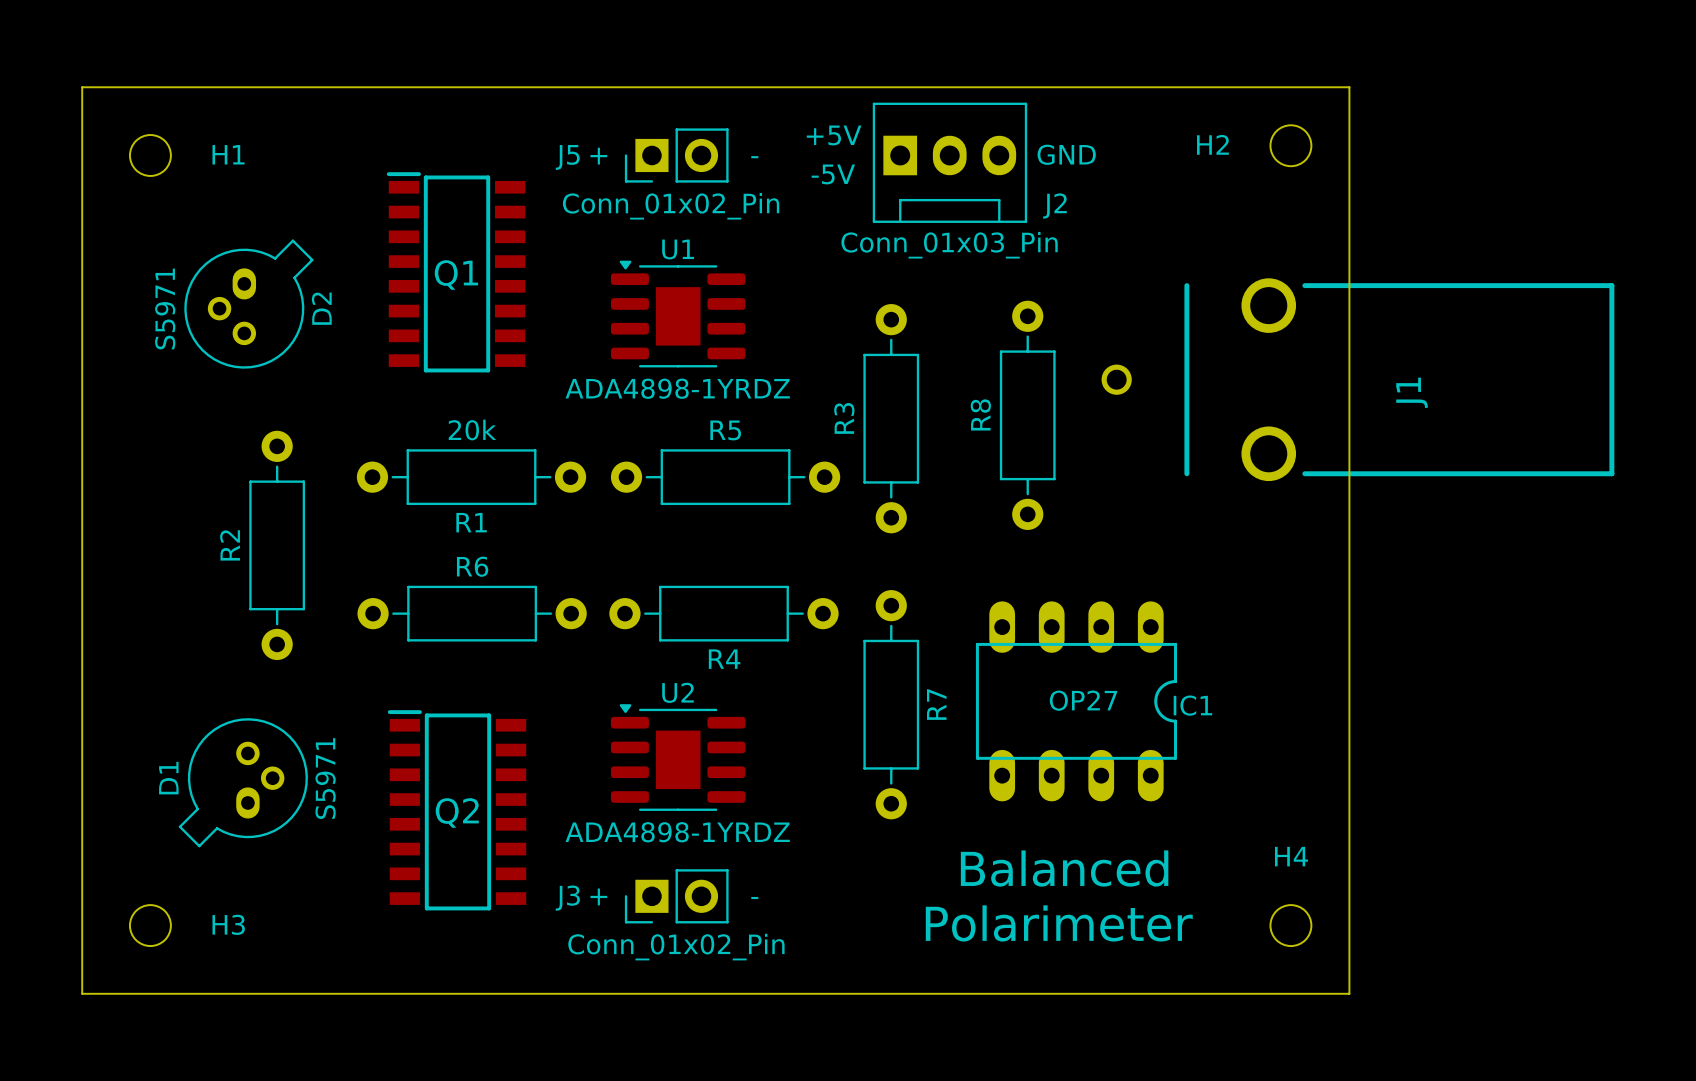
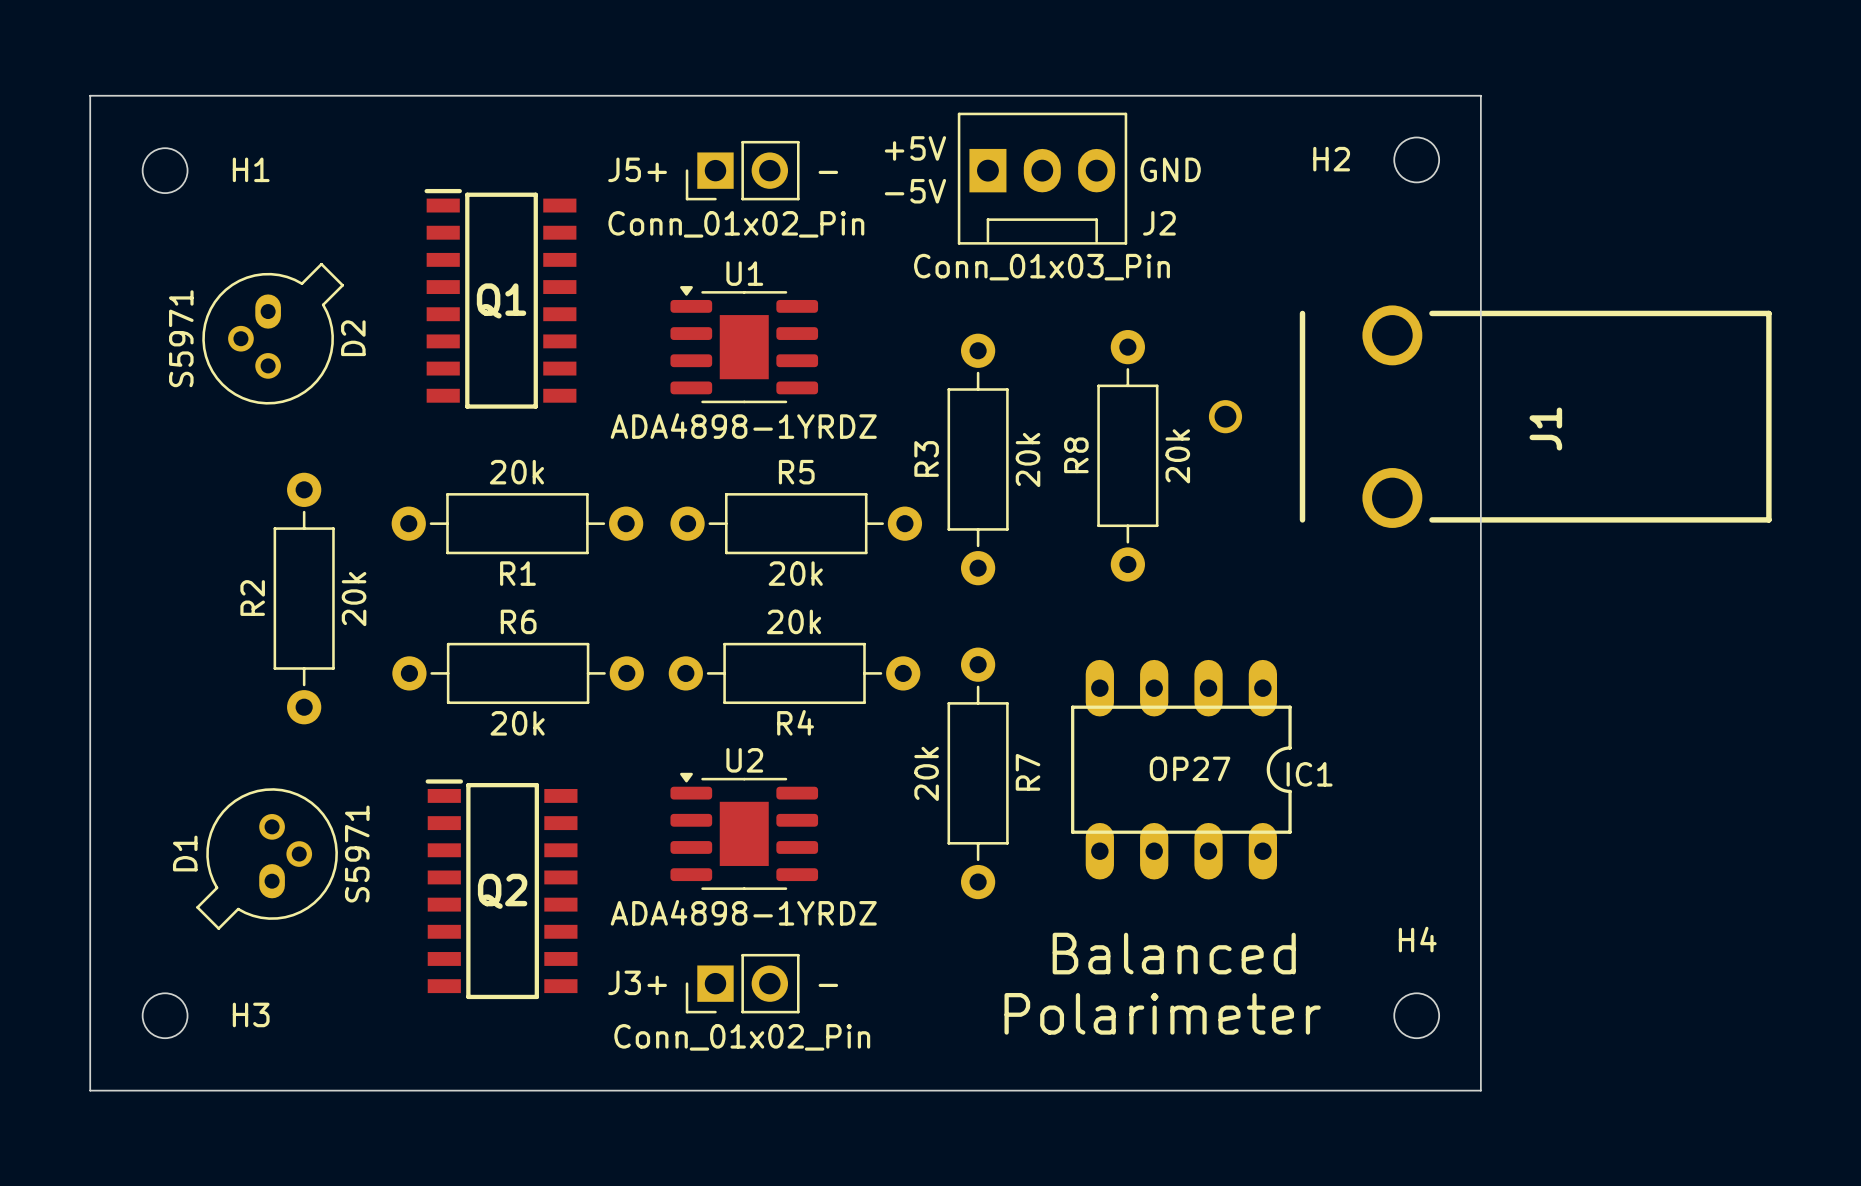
R8 value: none -> 20k (1177, 456)
R3 value: none -> 20k (1028, 459)
R5 value: none -> 20k (795, 573)
R2 value: none -> 20k (354, 599)
R4 value: none -> 20k (794, 621)
R6 value: none -> 20k (517, 723)
R7 value: none -> 20k (926, 773)

